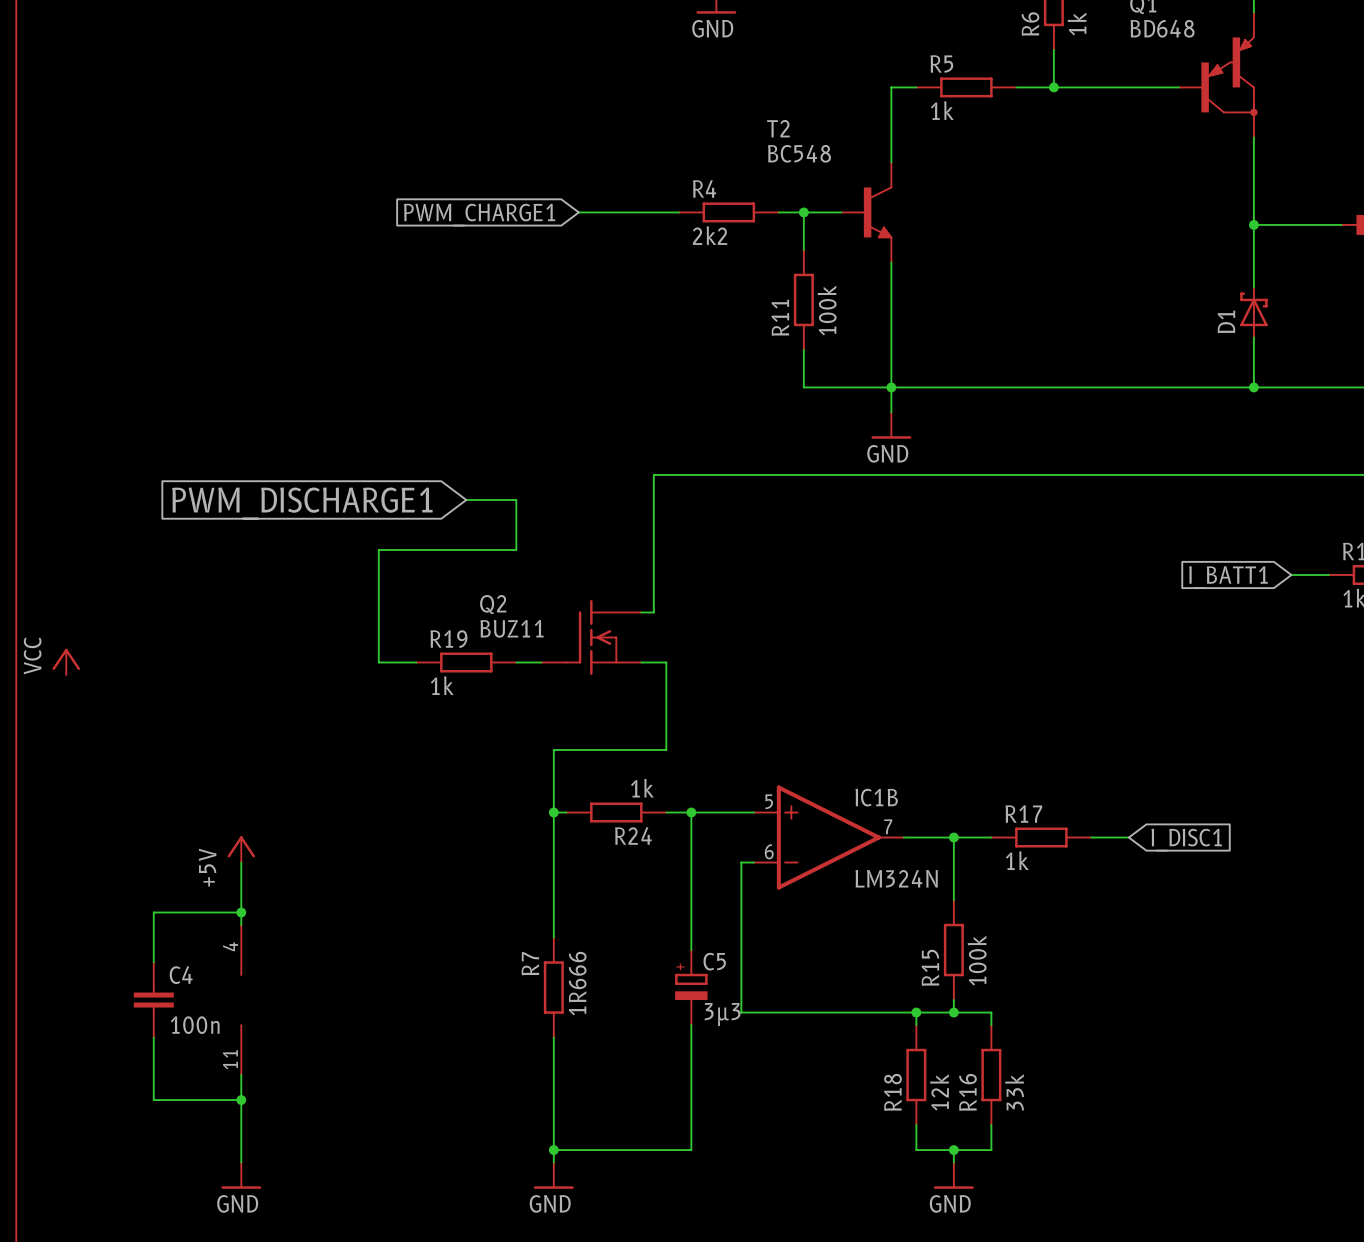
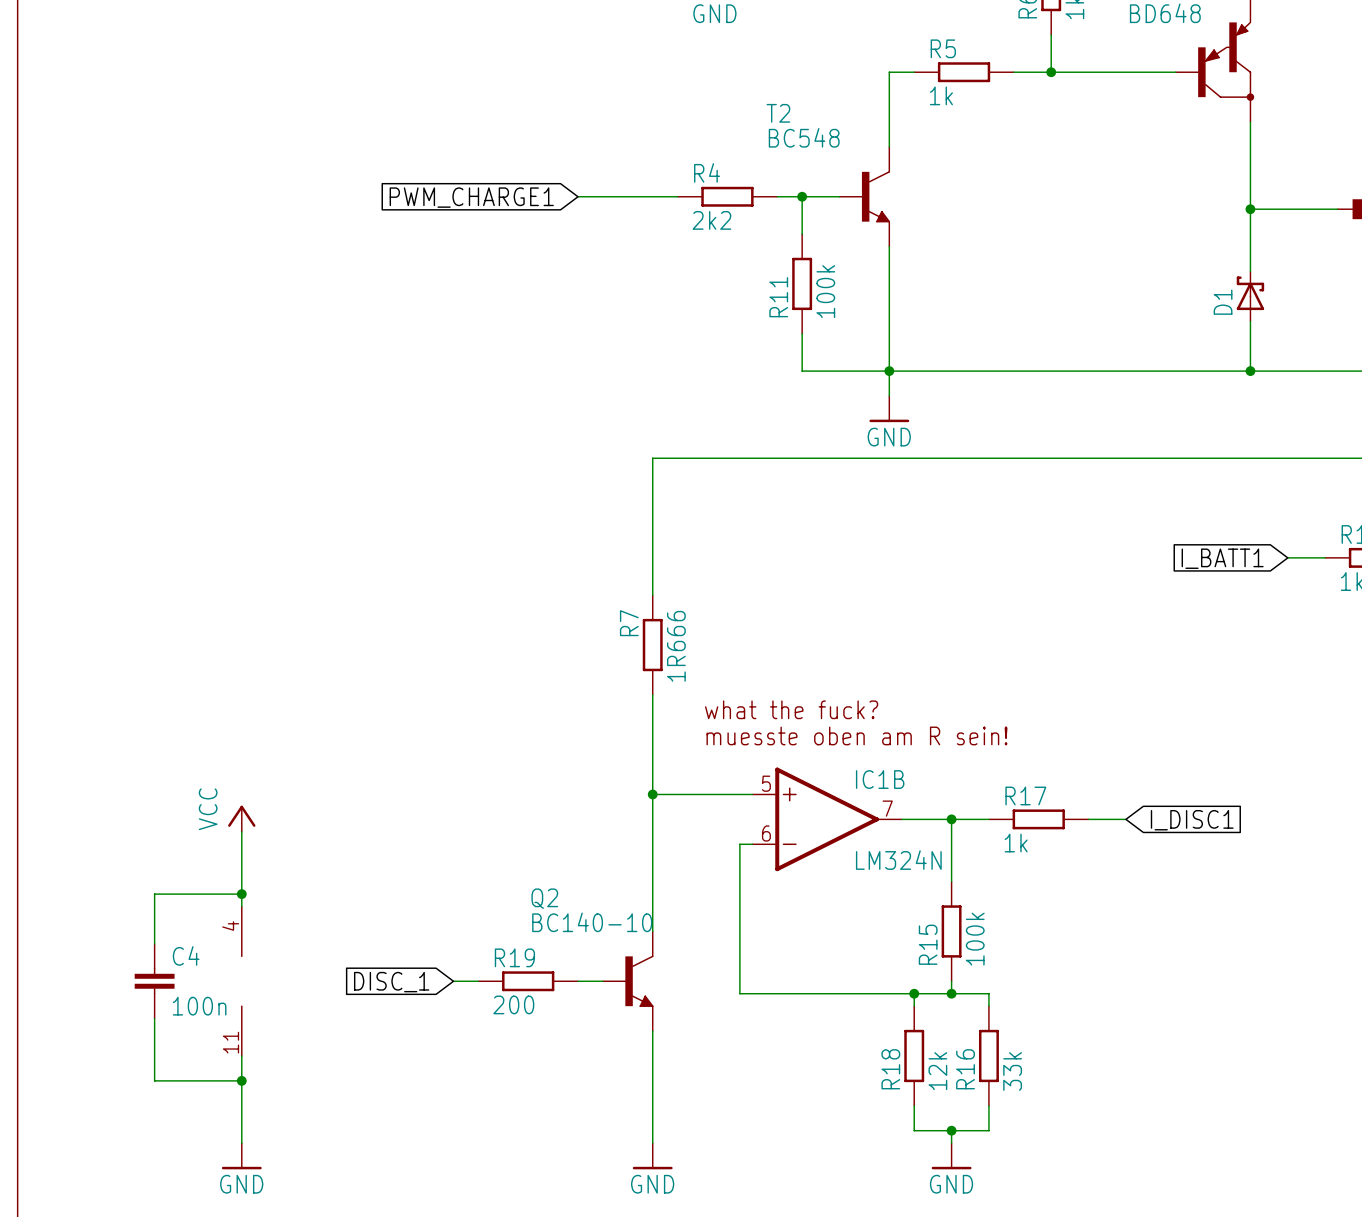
wire: (466, 499) (516, 499) (516, 549) (378, 549) (378, 662) (416, 662) -> none
global label: PWM_DISCHARGE1 (302, 503) -> none
Q2 symbol: [541, 599, 642, 676] -> [602, 931, 654, 1032]
Q2 name position: Q2 (493, 604) -> Q2 (544, 898)
wire: (641, 612) (653, 612) -> none
Q2 value: BUZ11 (512, 628) -> BC140-10 (592, 922)
power symbol: VCC (66, 661) -> none
R19 position: (466, 662) -> (528, 981)
wire: (516, 662) (541, 662) -> none
wire: (641, 662) (666, 662) (666, 750) (553, 750) (553, 937) -> none
R19 value: 1k (442, 685) -> 200 (513, 1004)
wire: none -> (652, 694) (652, 931)
text: none -> what the fuck? (791, 709)
text: none -> muesste oben am R sein! (856, 735)
junction: (553, 812) -> none
R24: 1k (616, 812) -> none
wire: (691, 812) (691, 950) -> none
junction position: (691, 812) -> (652, 794)
power symbol: none -> VCC (241, 818)
power symbol: +5V (241, 849) -> none
R7 position: (553, 987) -> (652, 645)
C5: 3µ3 (691, 987) -> none
wire: none -> (453, 981) (478, 981)
wire: none -> (578, 981) (602, 981)
global label: none -> DISC_1 (391, 982)
wire: (691, 1025) (691, 1150) (553, 1150) -> none
wire: (553, 1037) (553, 1162) -> none
wire: none -> (652, 1031) (652, 1143)
junction: (553, 1150) -> none
power symbol position: GND (553, 1175) -> GND (652, 1156)

